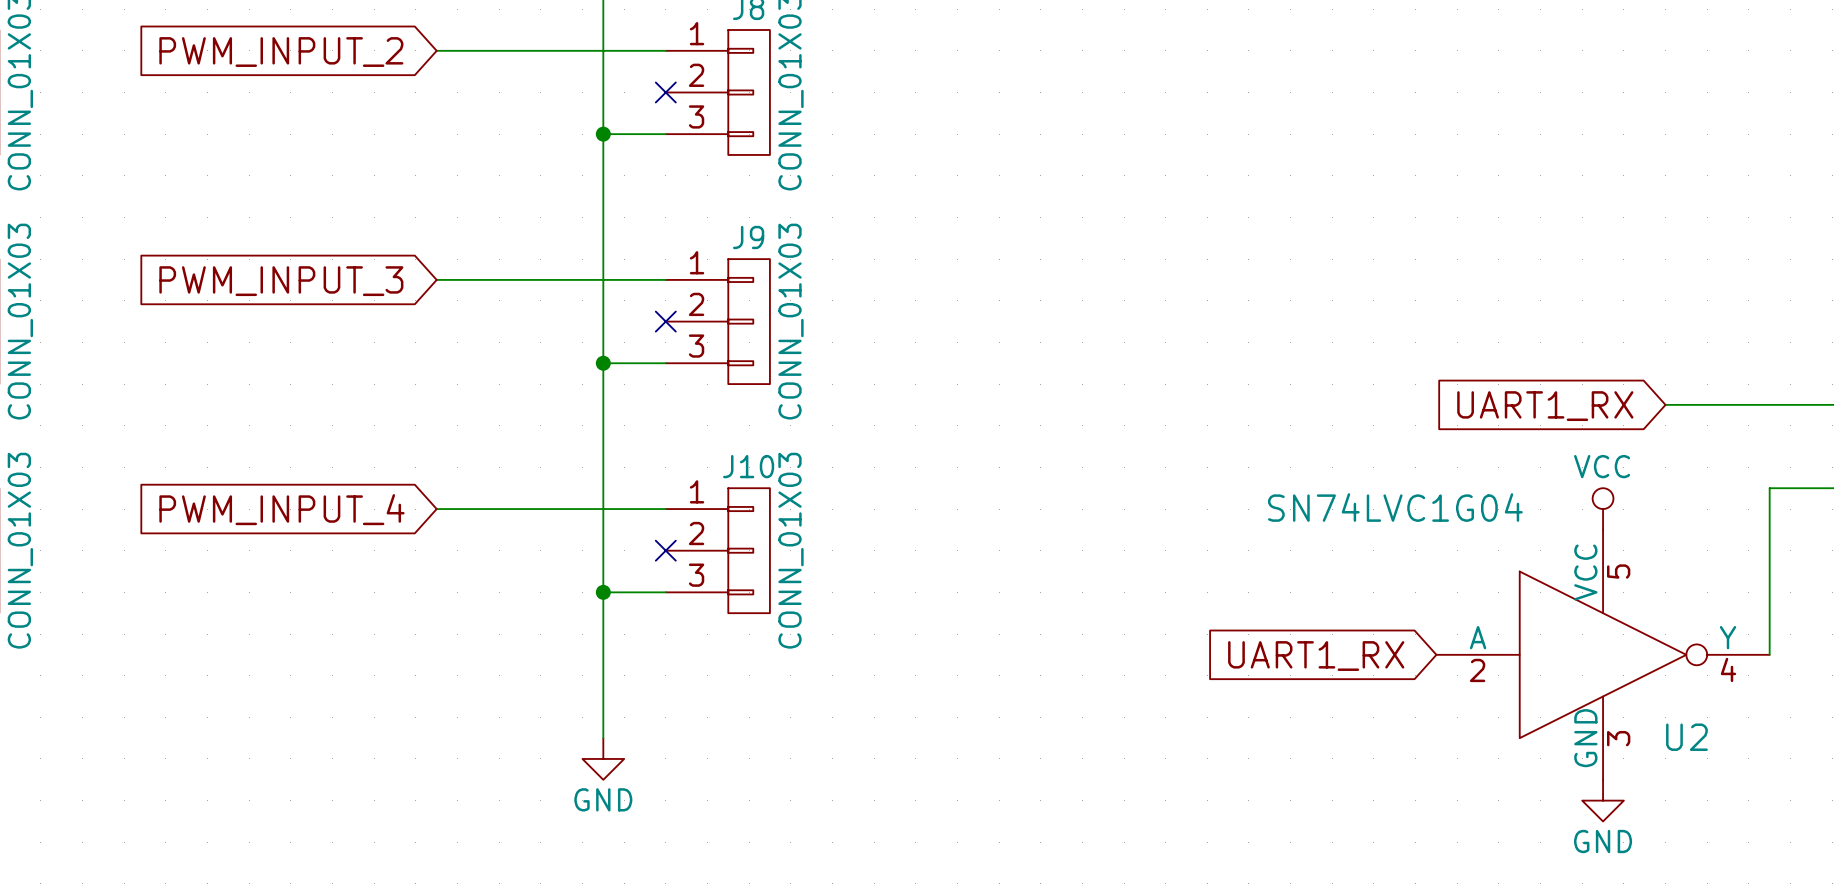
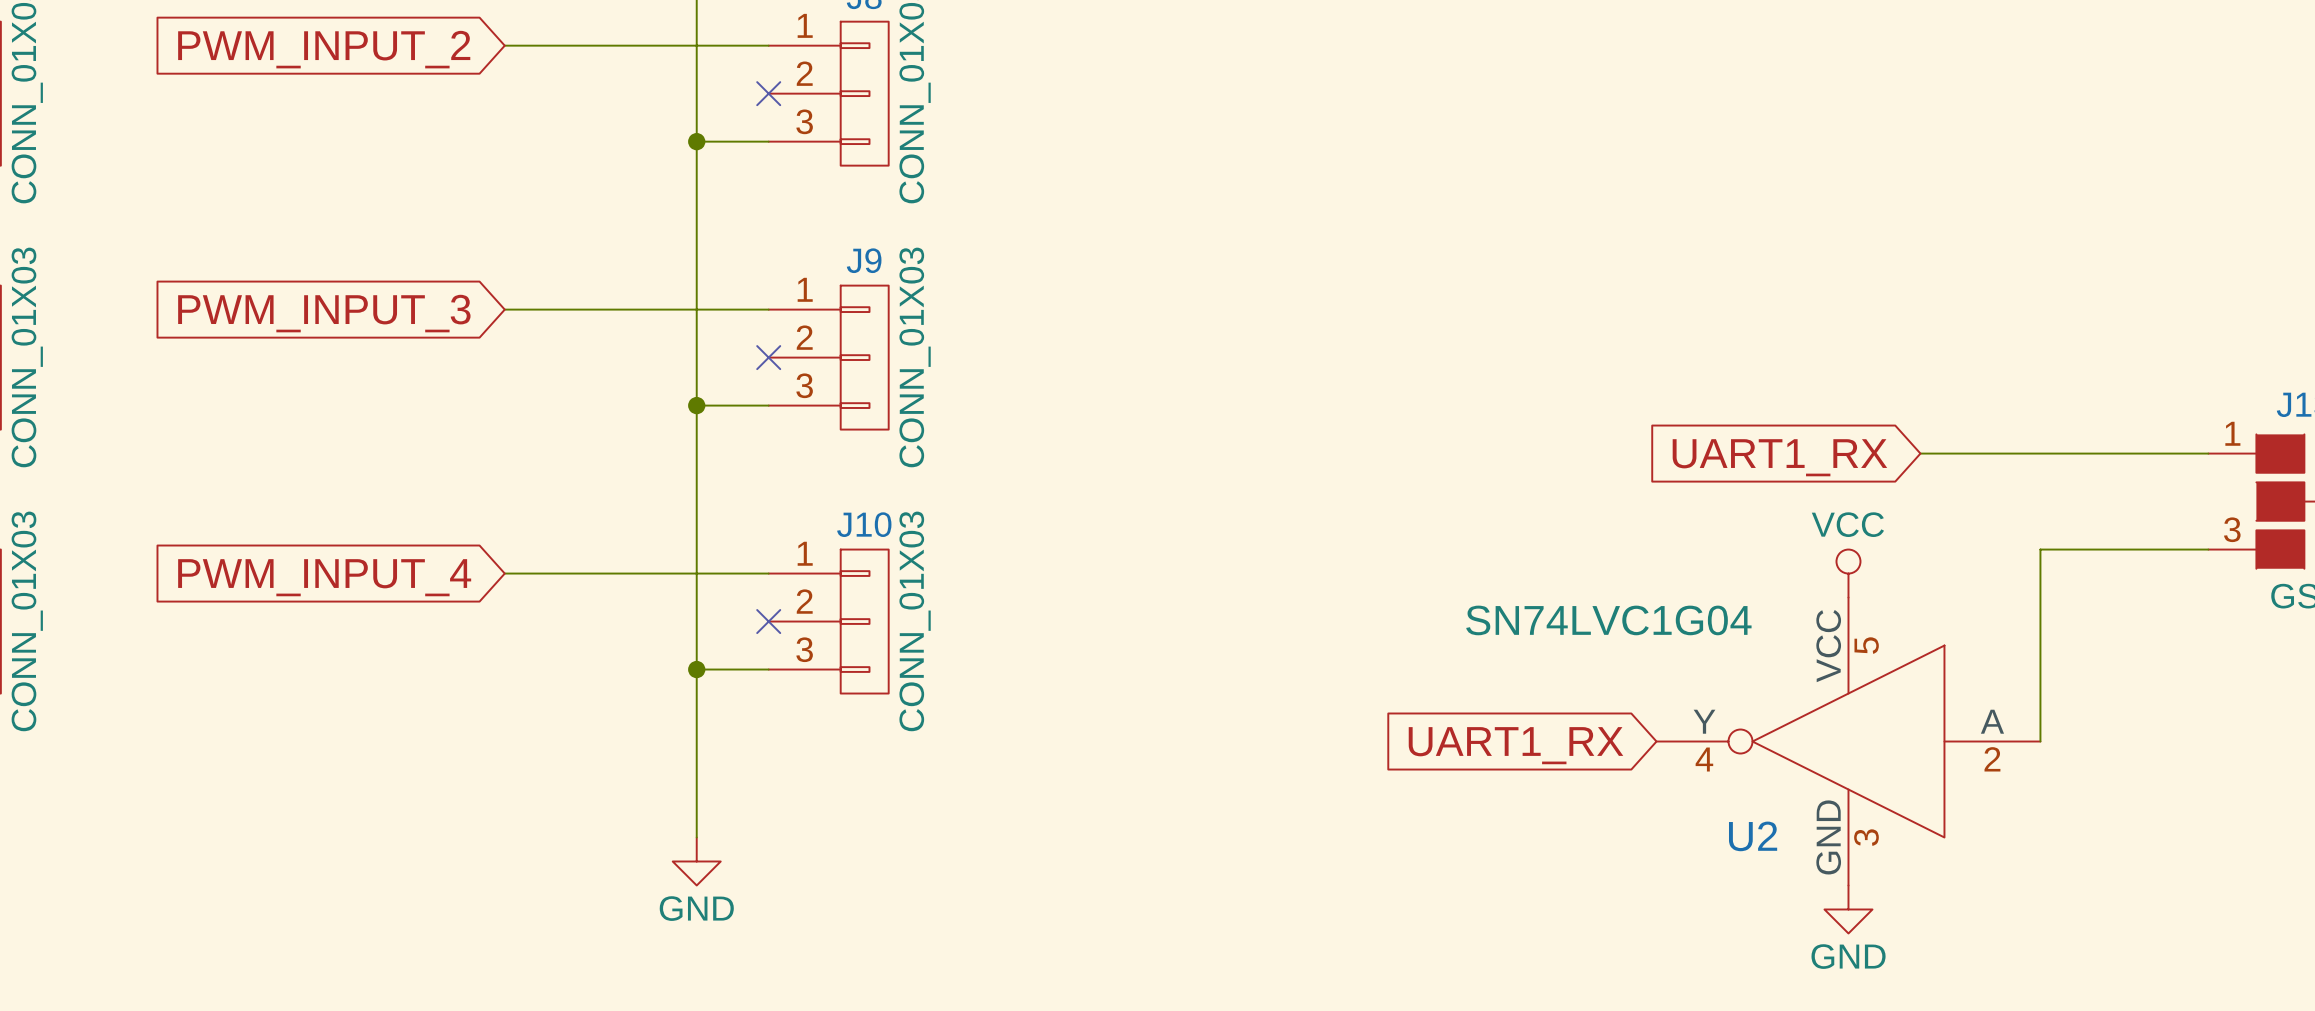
U2 value position: SN74LVC1G04 (1395, 507) -> SN74LVC1G04 (1608, 620)
U2 flip: as is (1603, 654) -> left-right (1848, 741)

